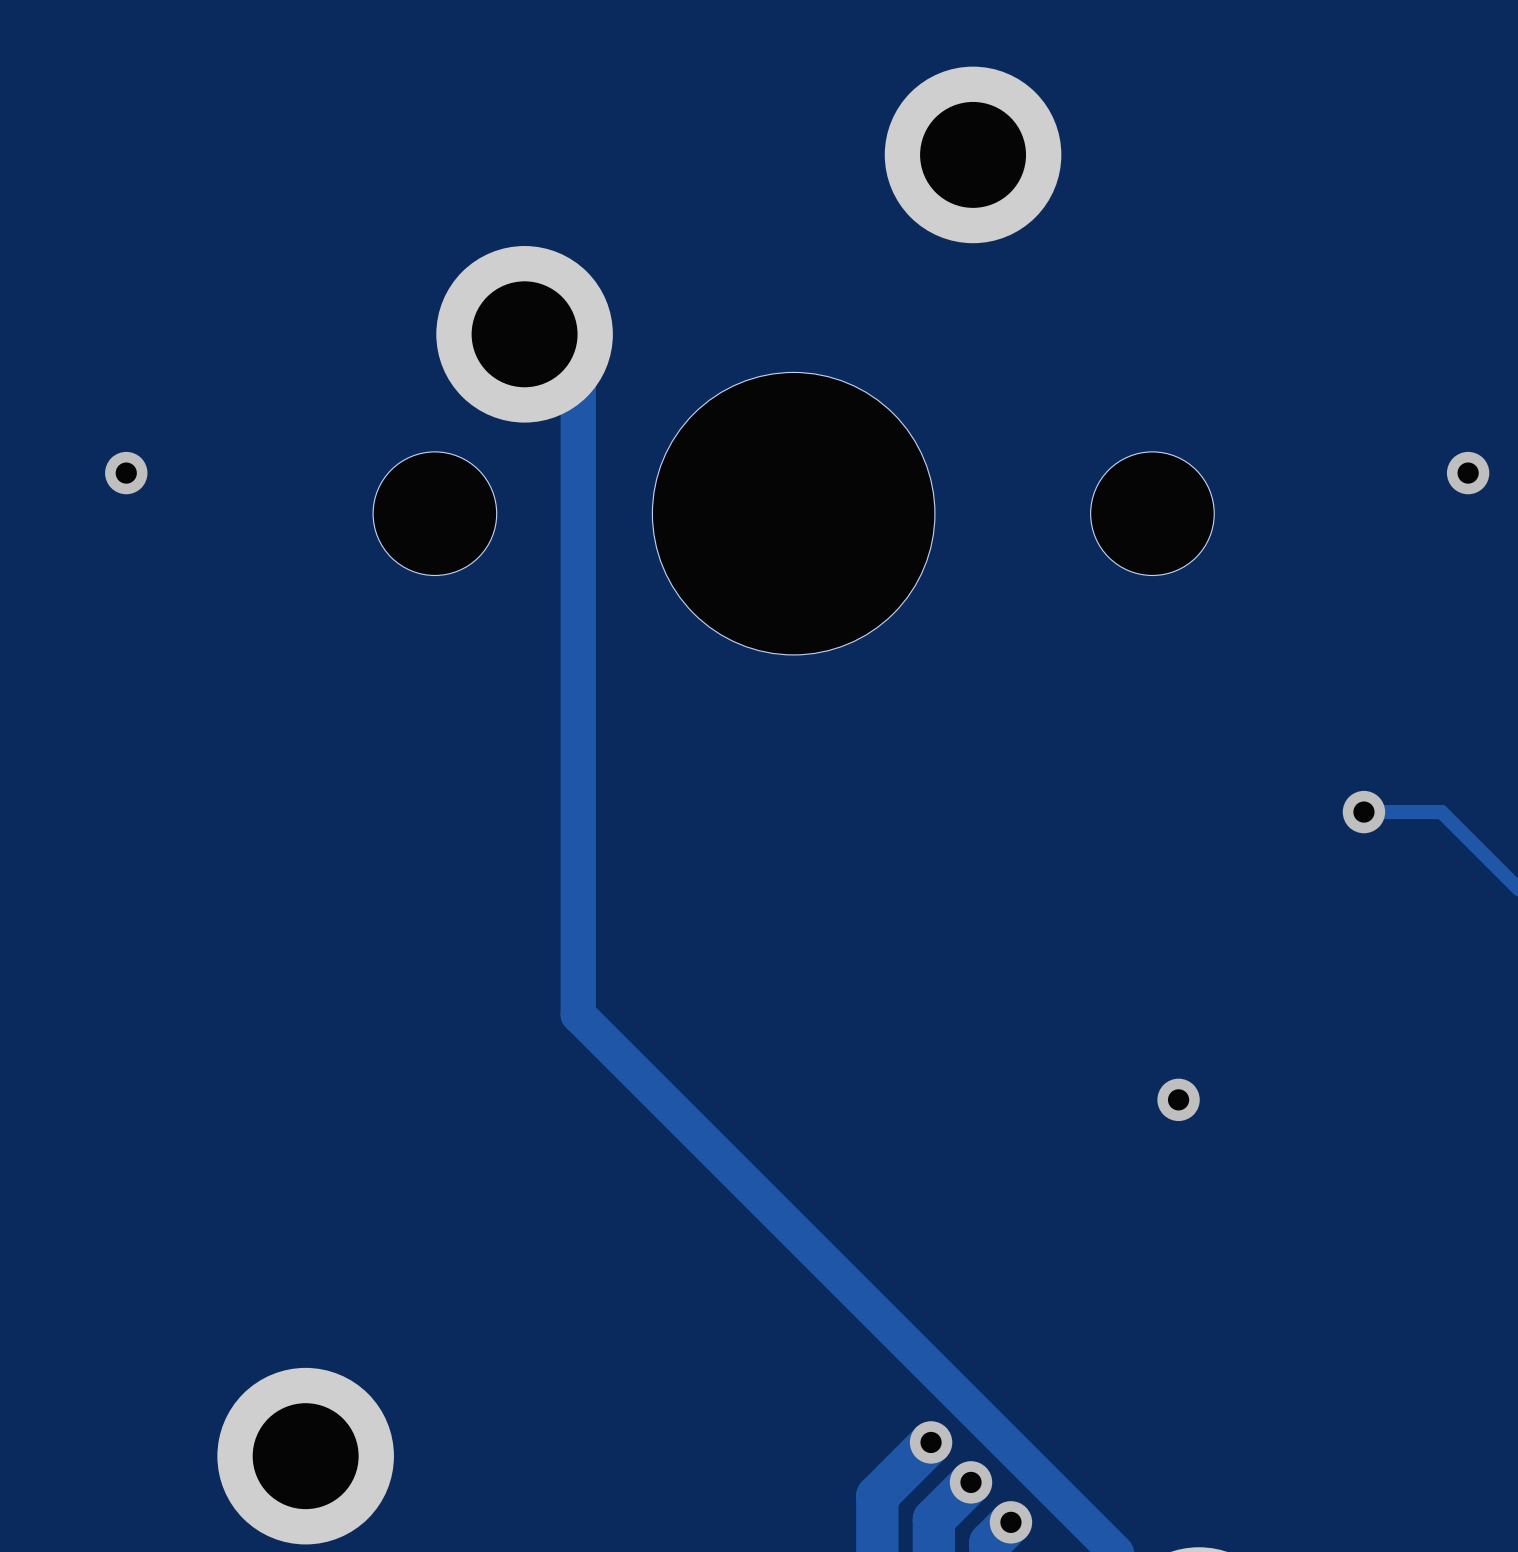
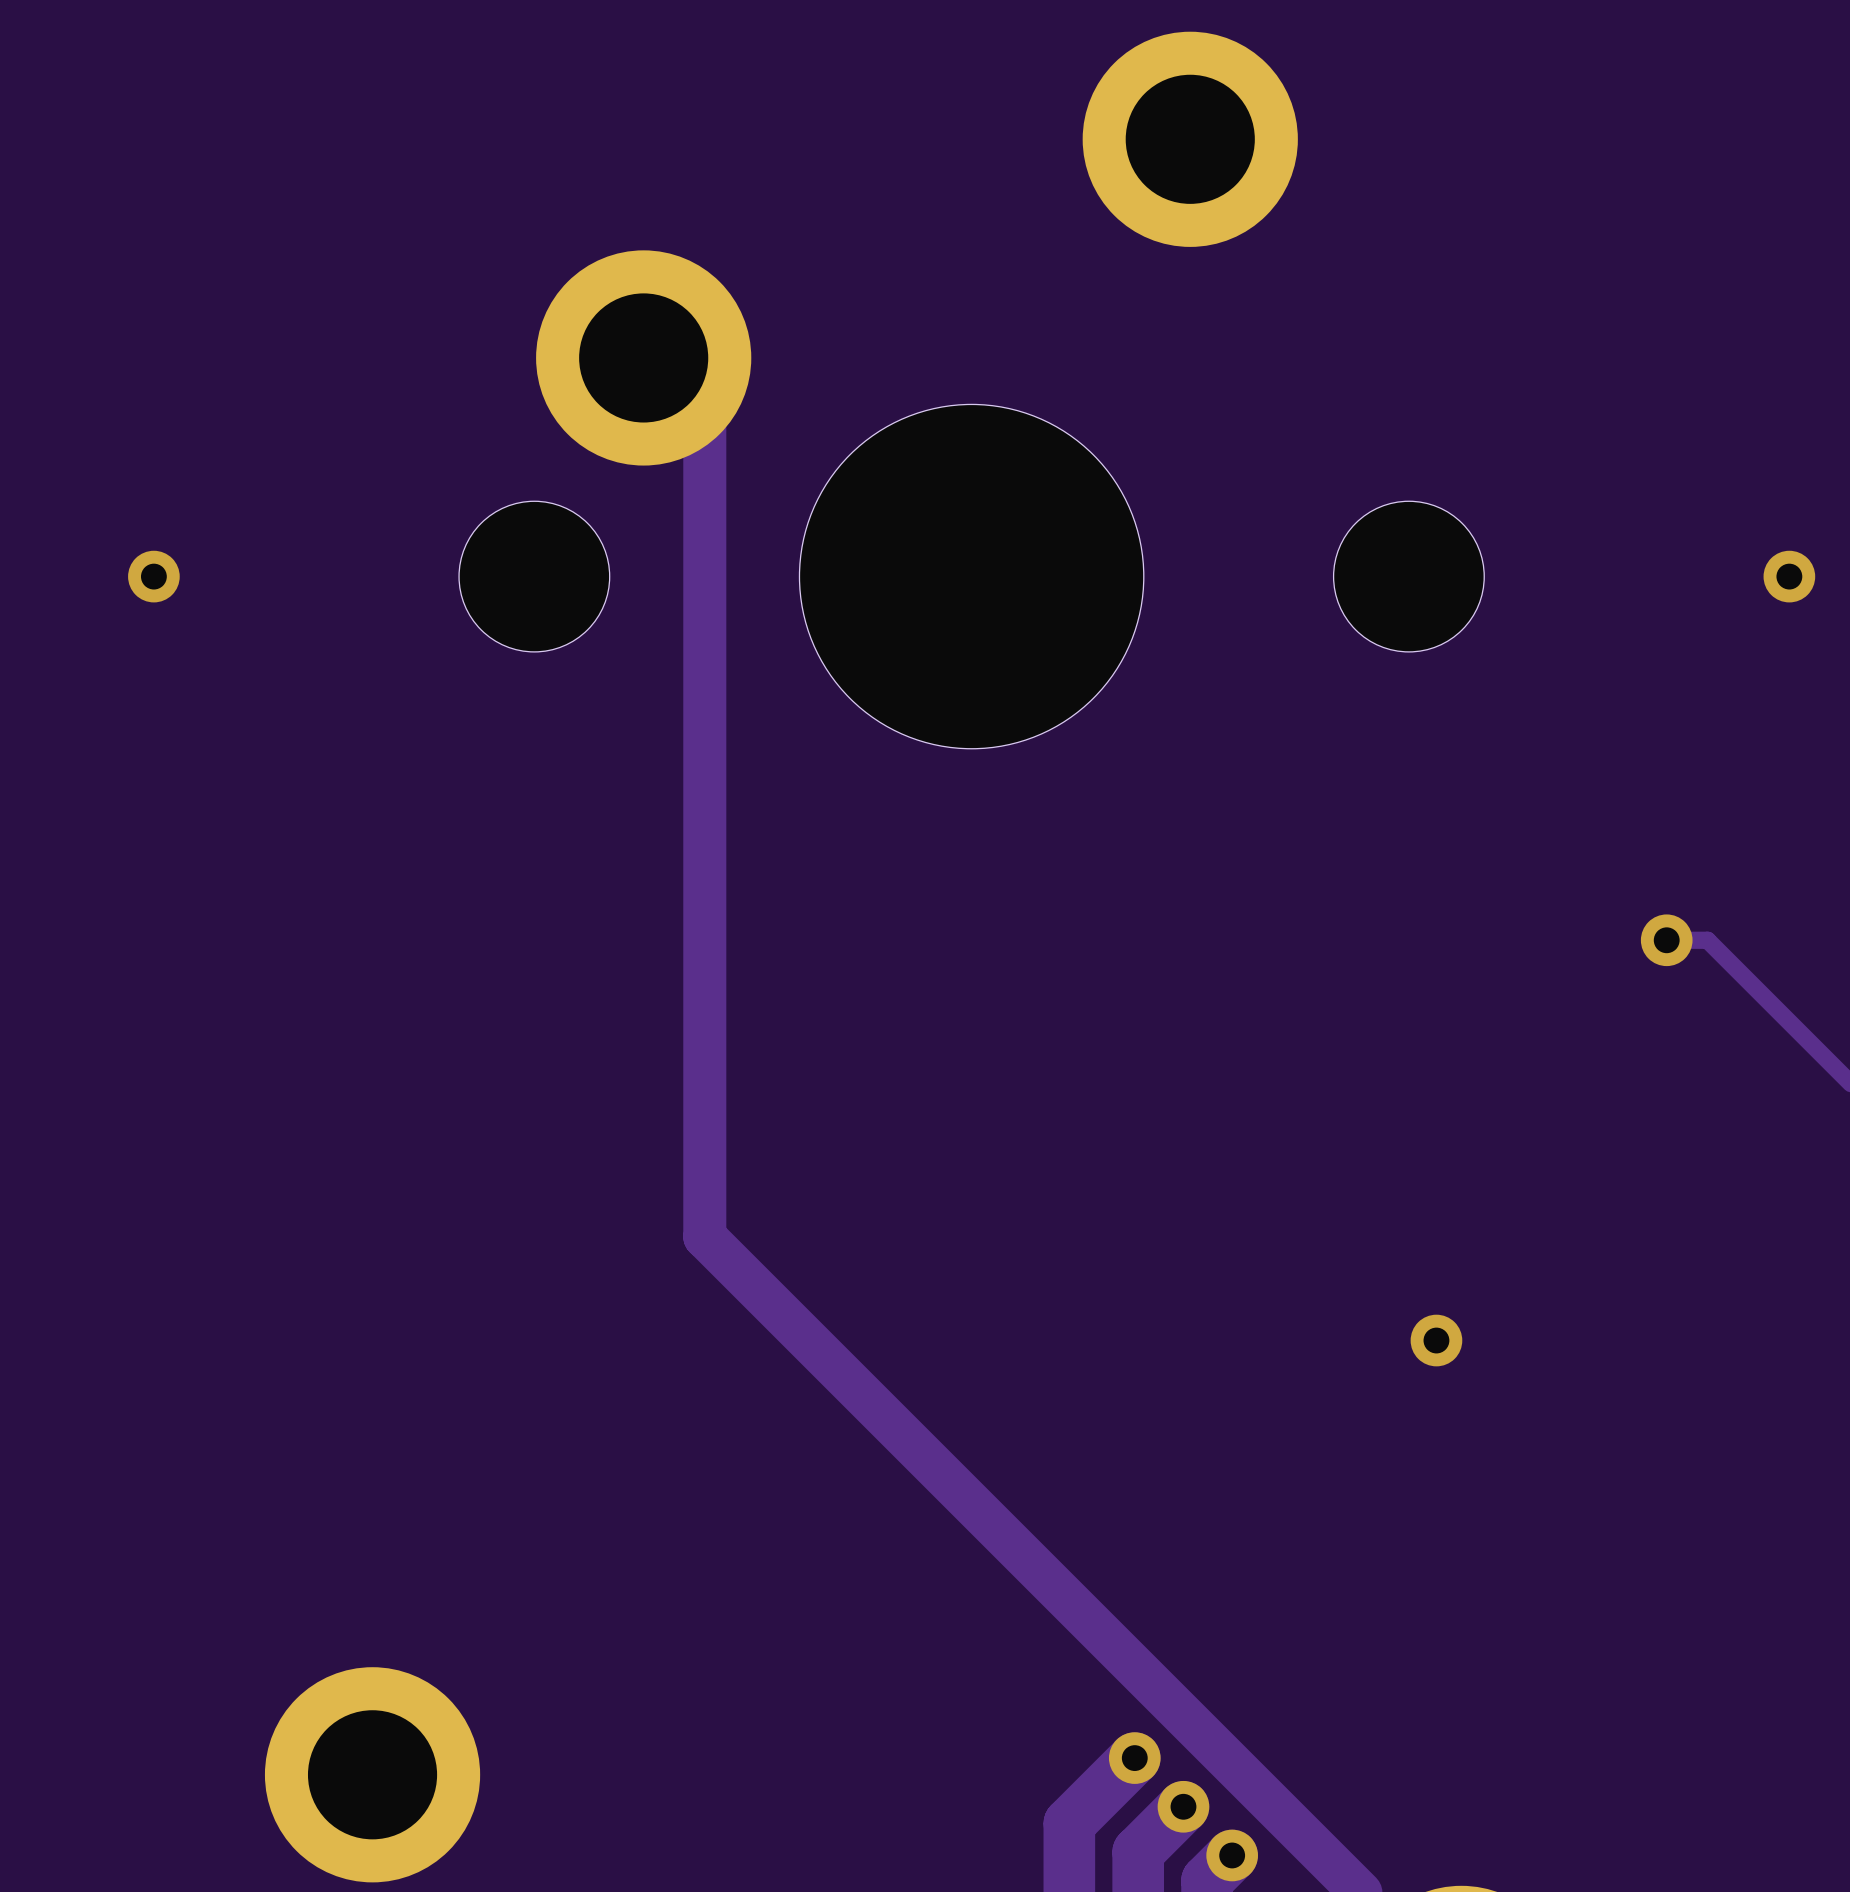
part position: (793, 360) -> (971, 390)
track: (1363, 812) (1441, 812) -> (1666, 940) (1707, 940) (1757, 989)
via position: (1363, 812) -> (1666, 940)

